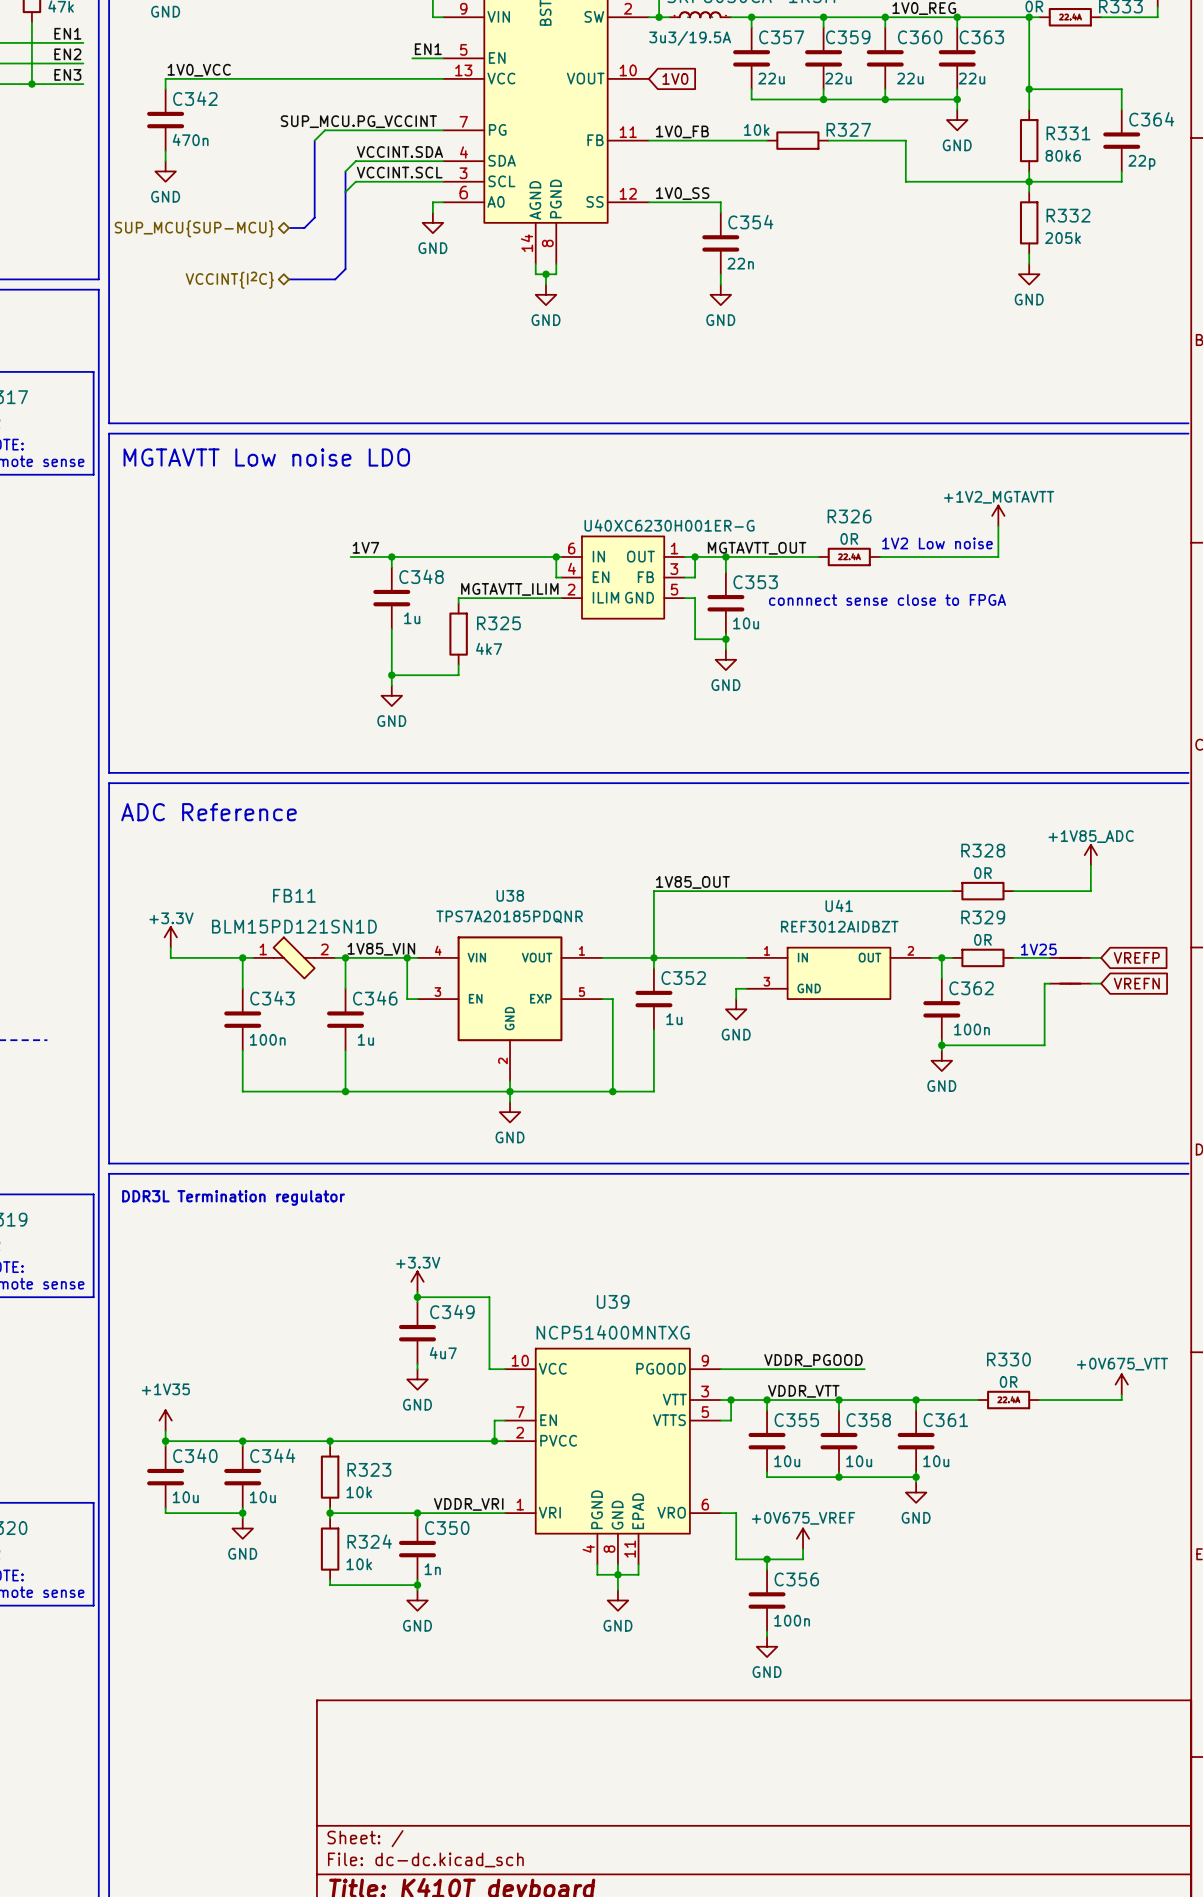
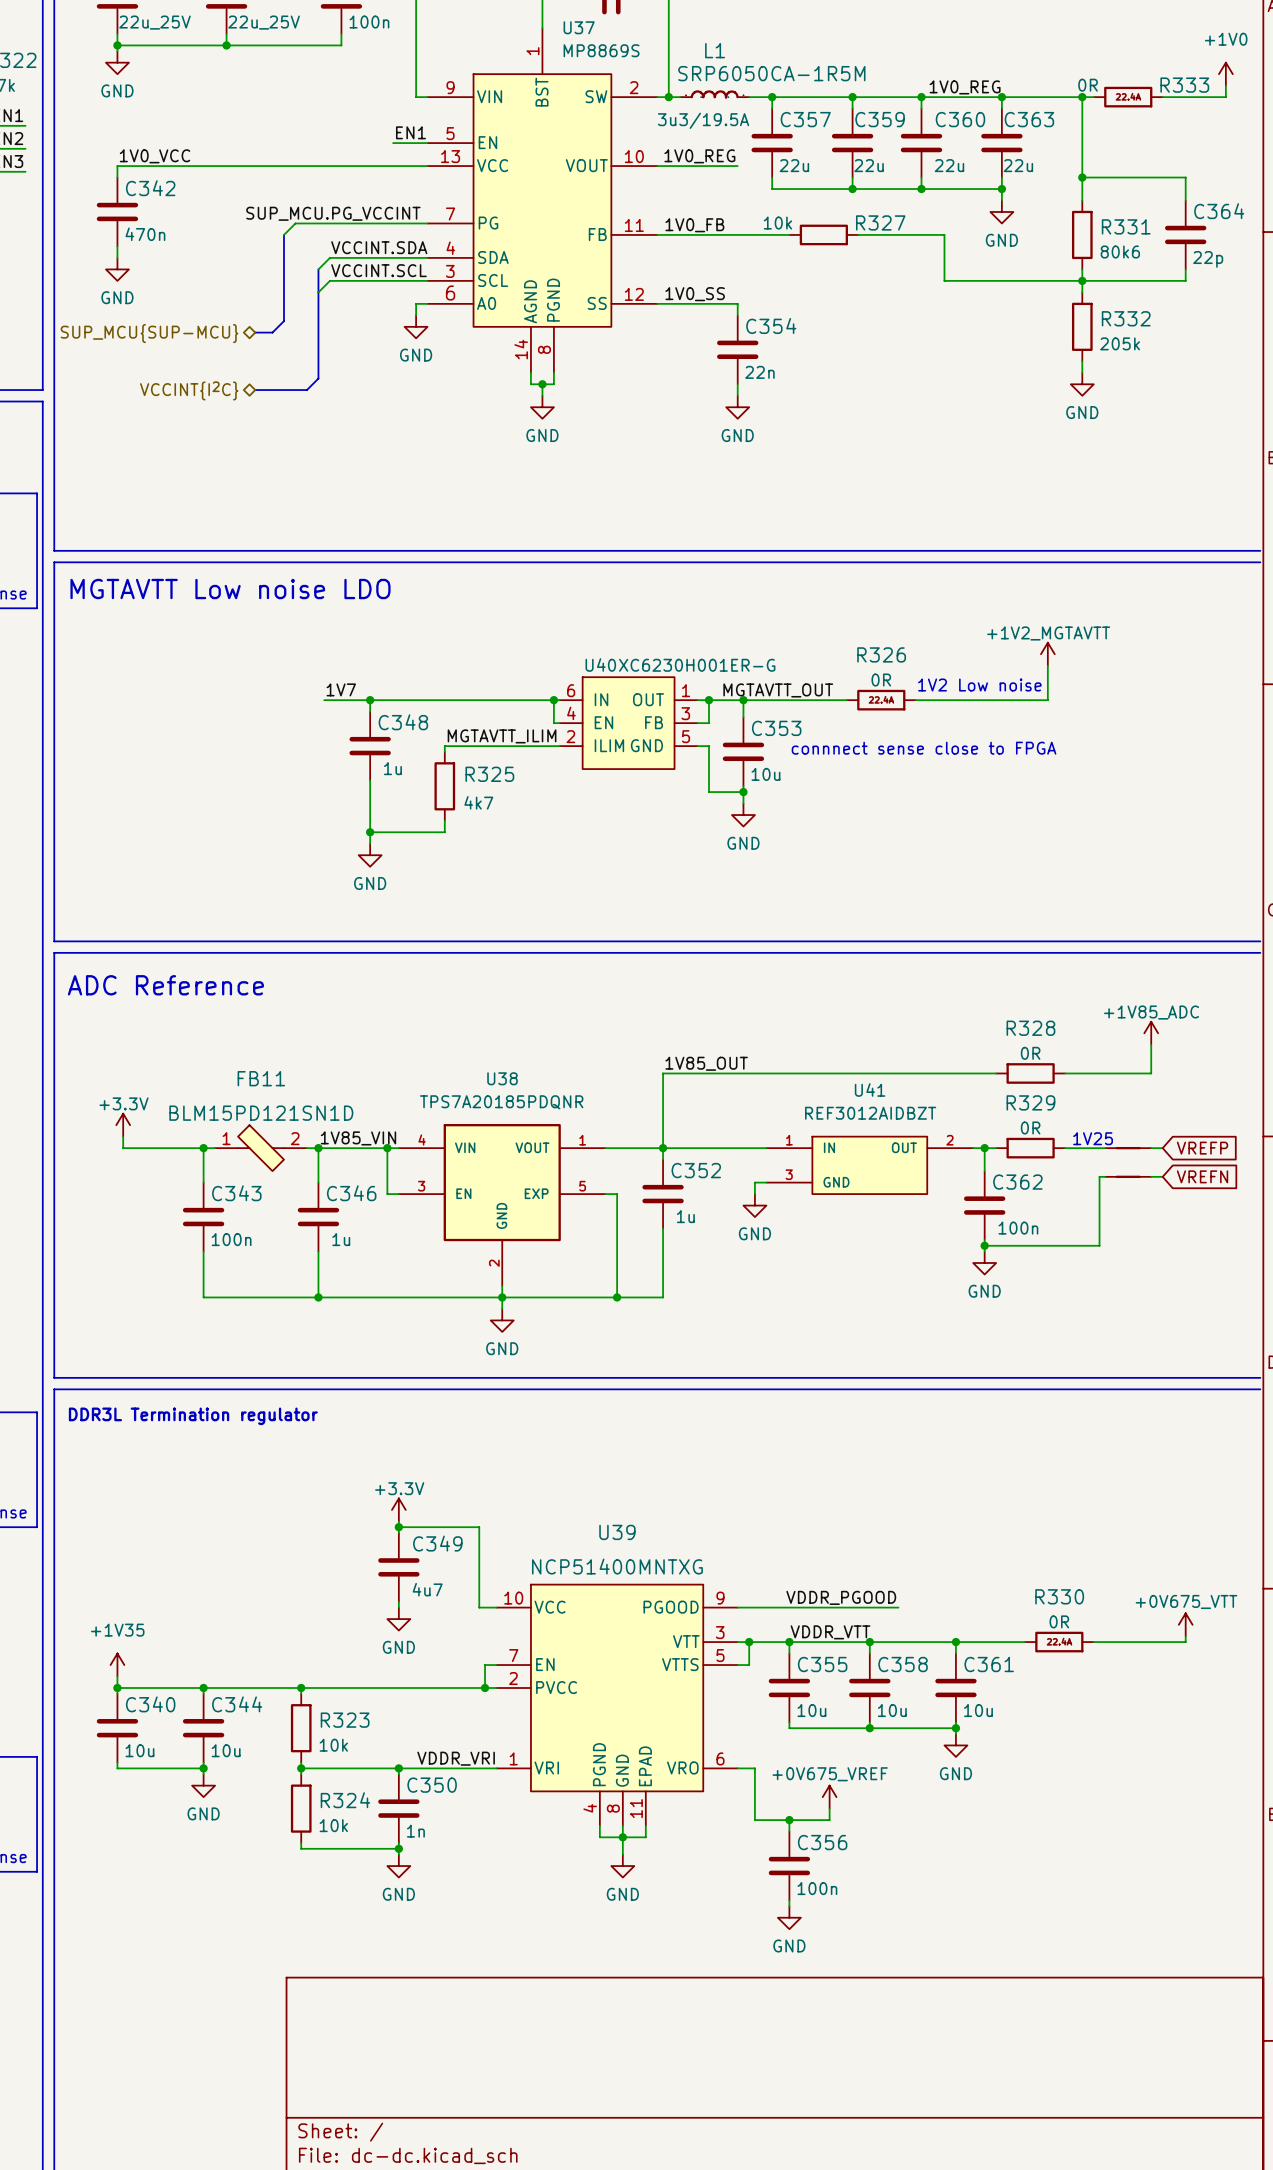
label: none -> 1V0_REG (699, 156)
wire: none -> (657, 166) (737, 166)
global label: 1V0 (675, 78) -> none

